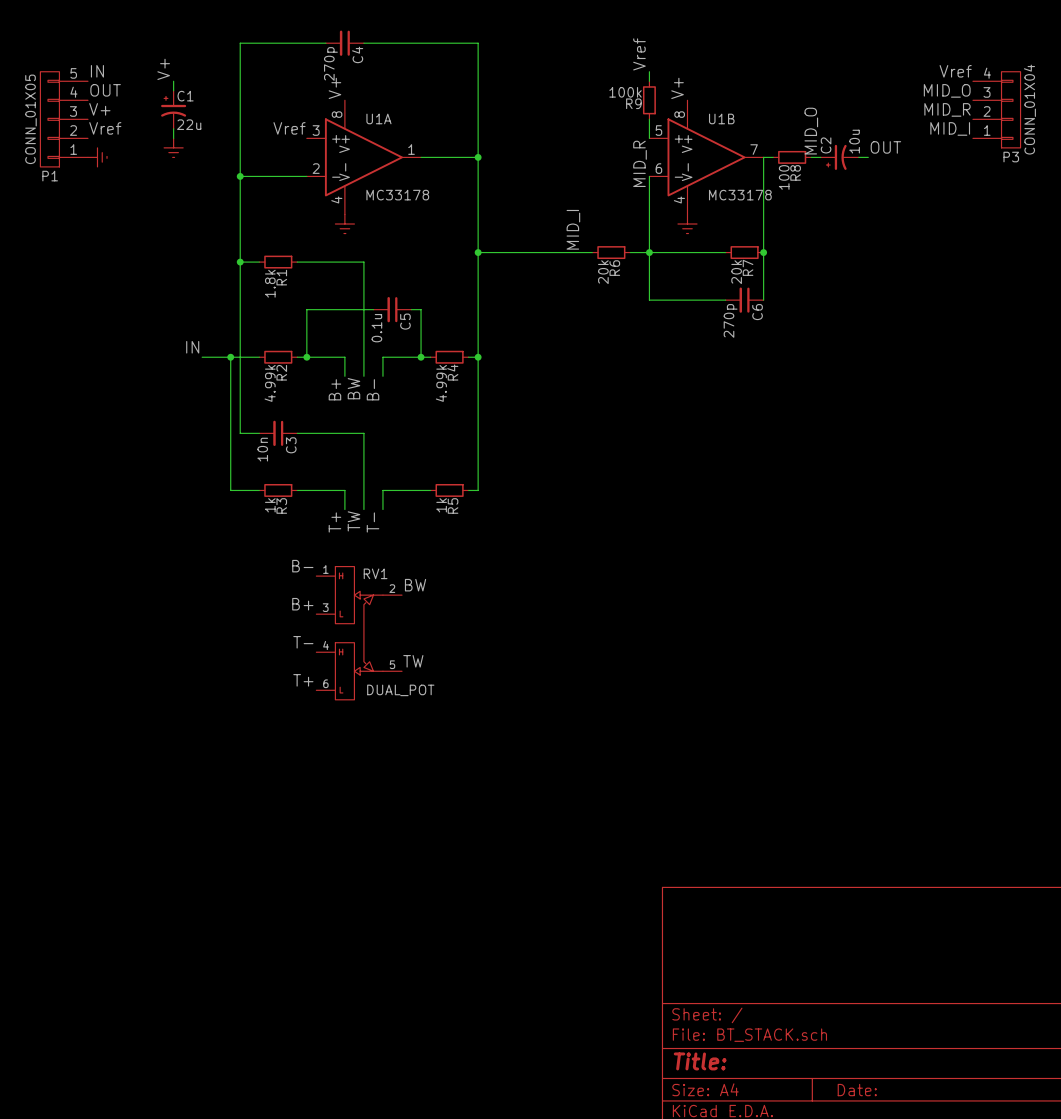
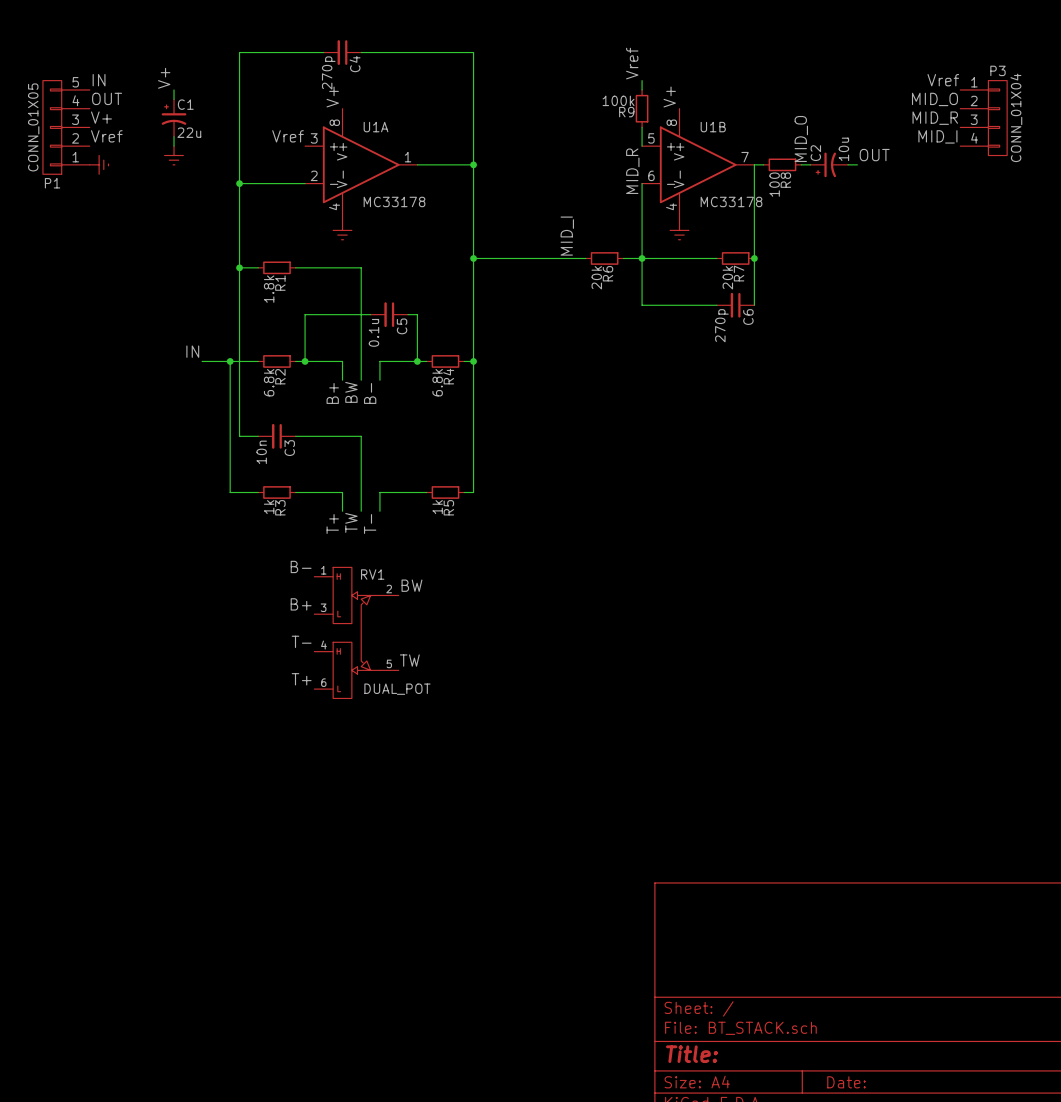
P3 flip: as is (1011, 109) -> up-down (997, 118)
R2 value: 4.99k (270, 383) -> 6.8k (269, 382)
R4 value: 4.99k (441, 383) -> 6.8k (437, 382)

